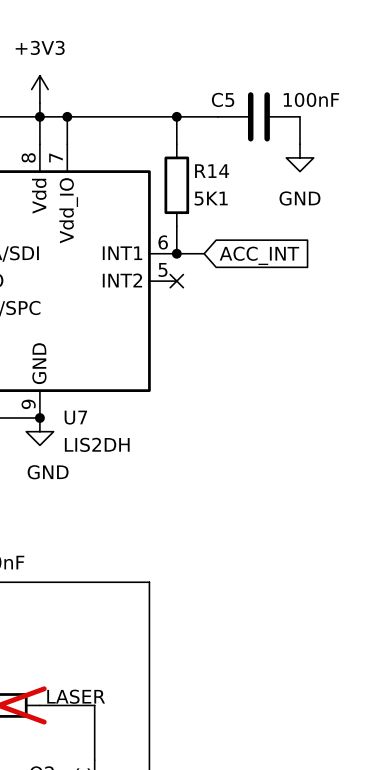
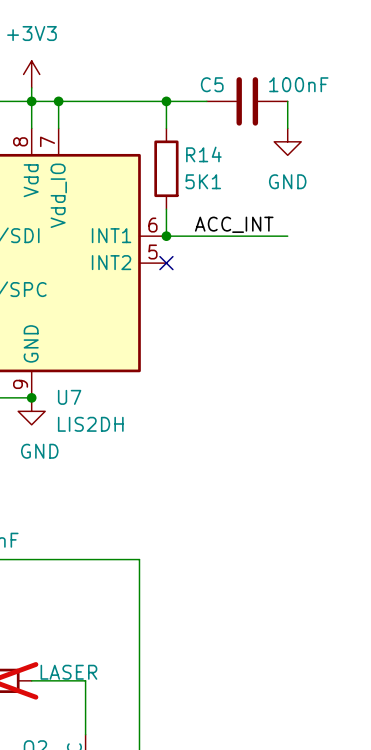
label: none -> ACC_INT (234, 224)
wire: none -> (193, 236) (287, 236)
global label: ACC_INT (259, 255) -> none

